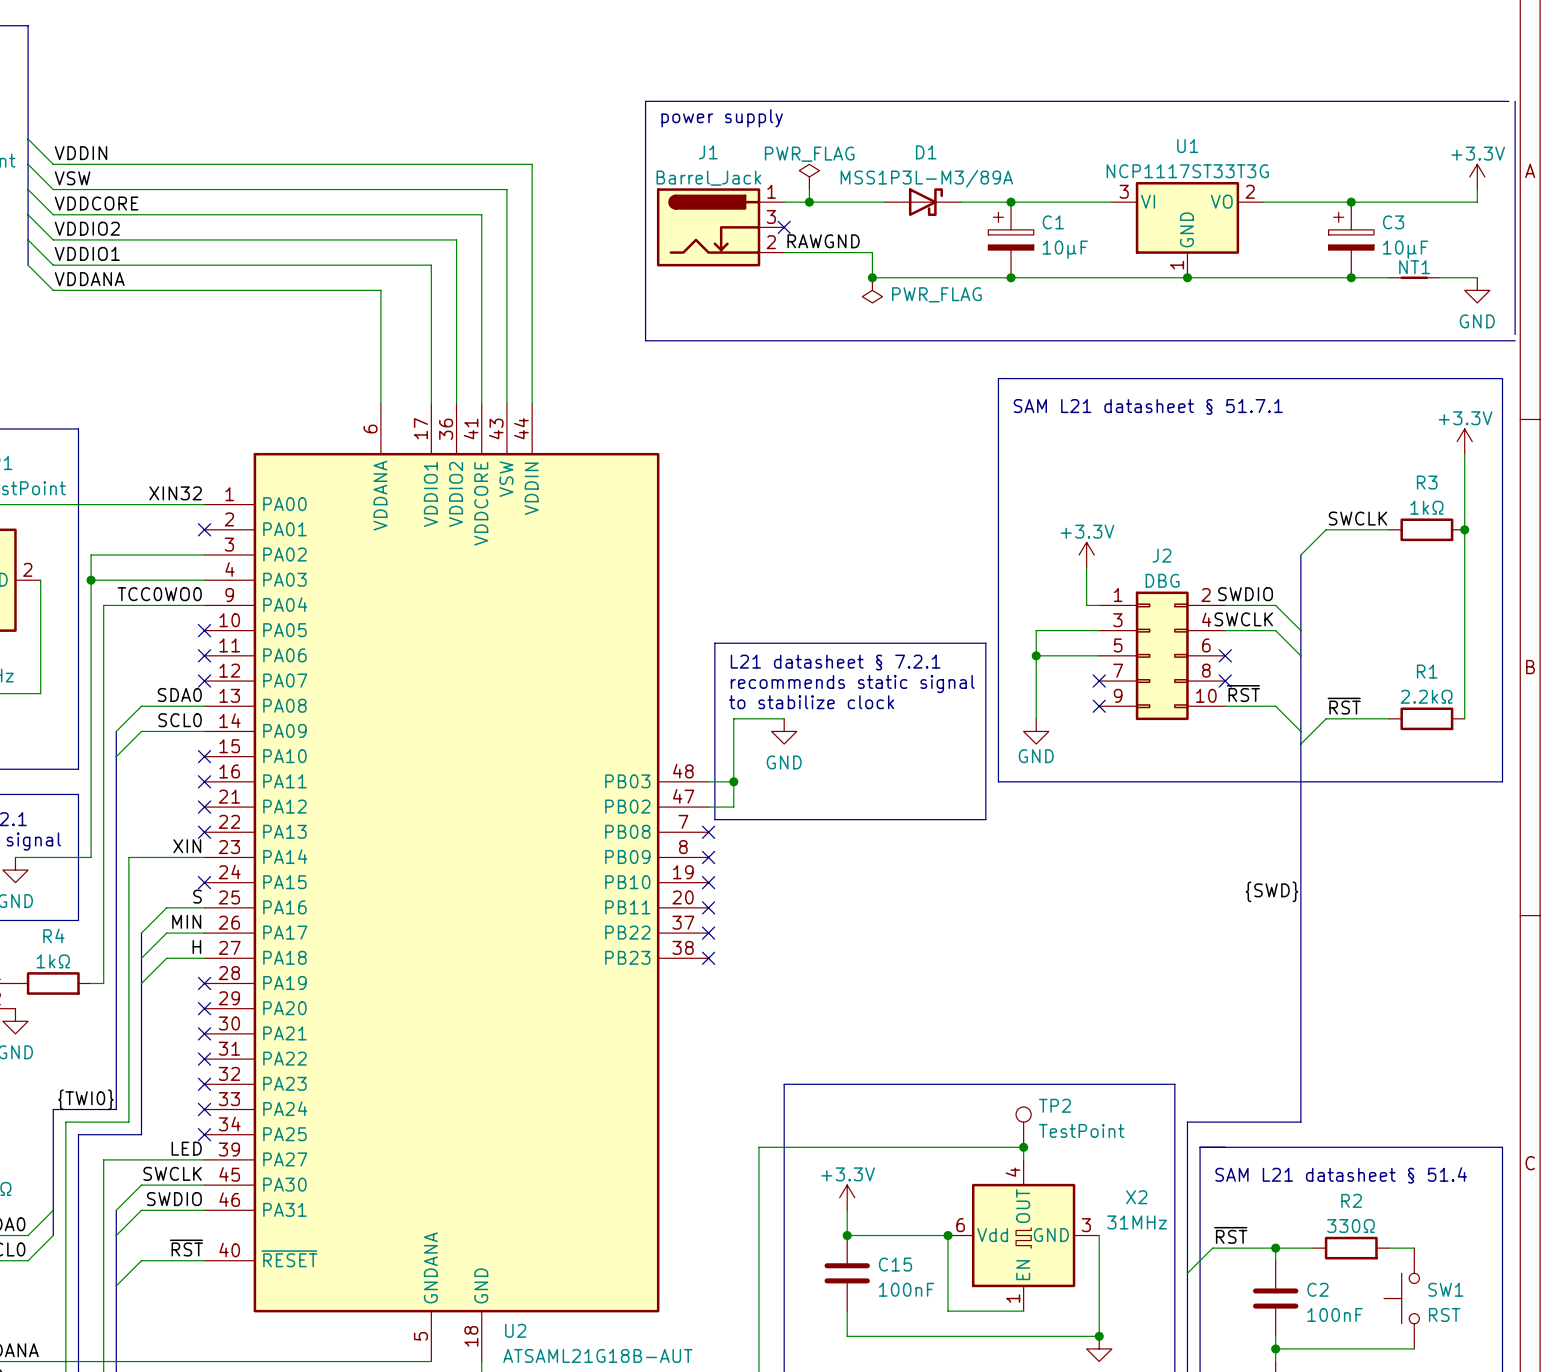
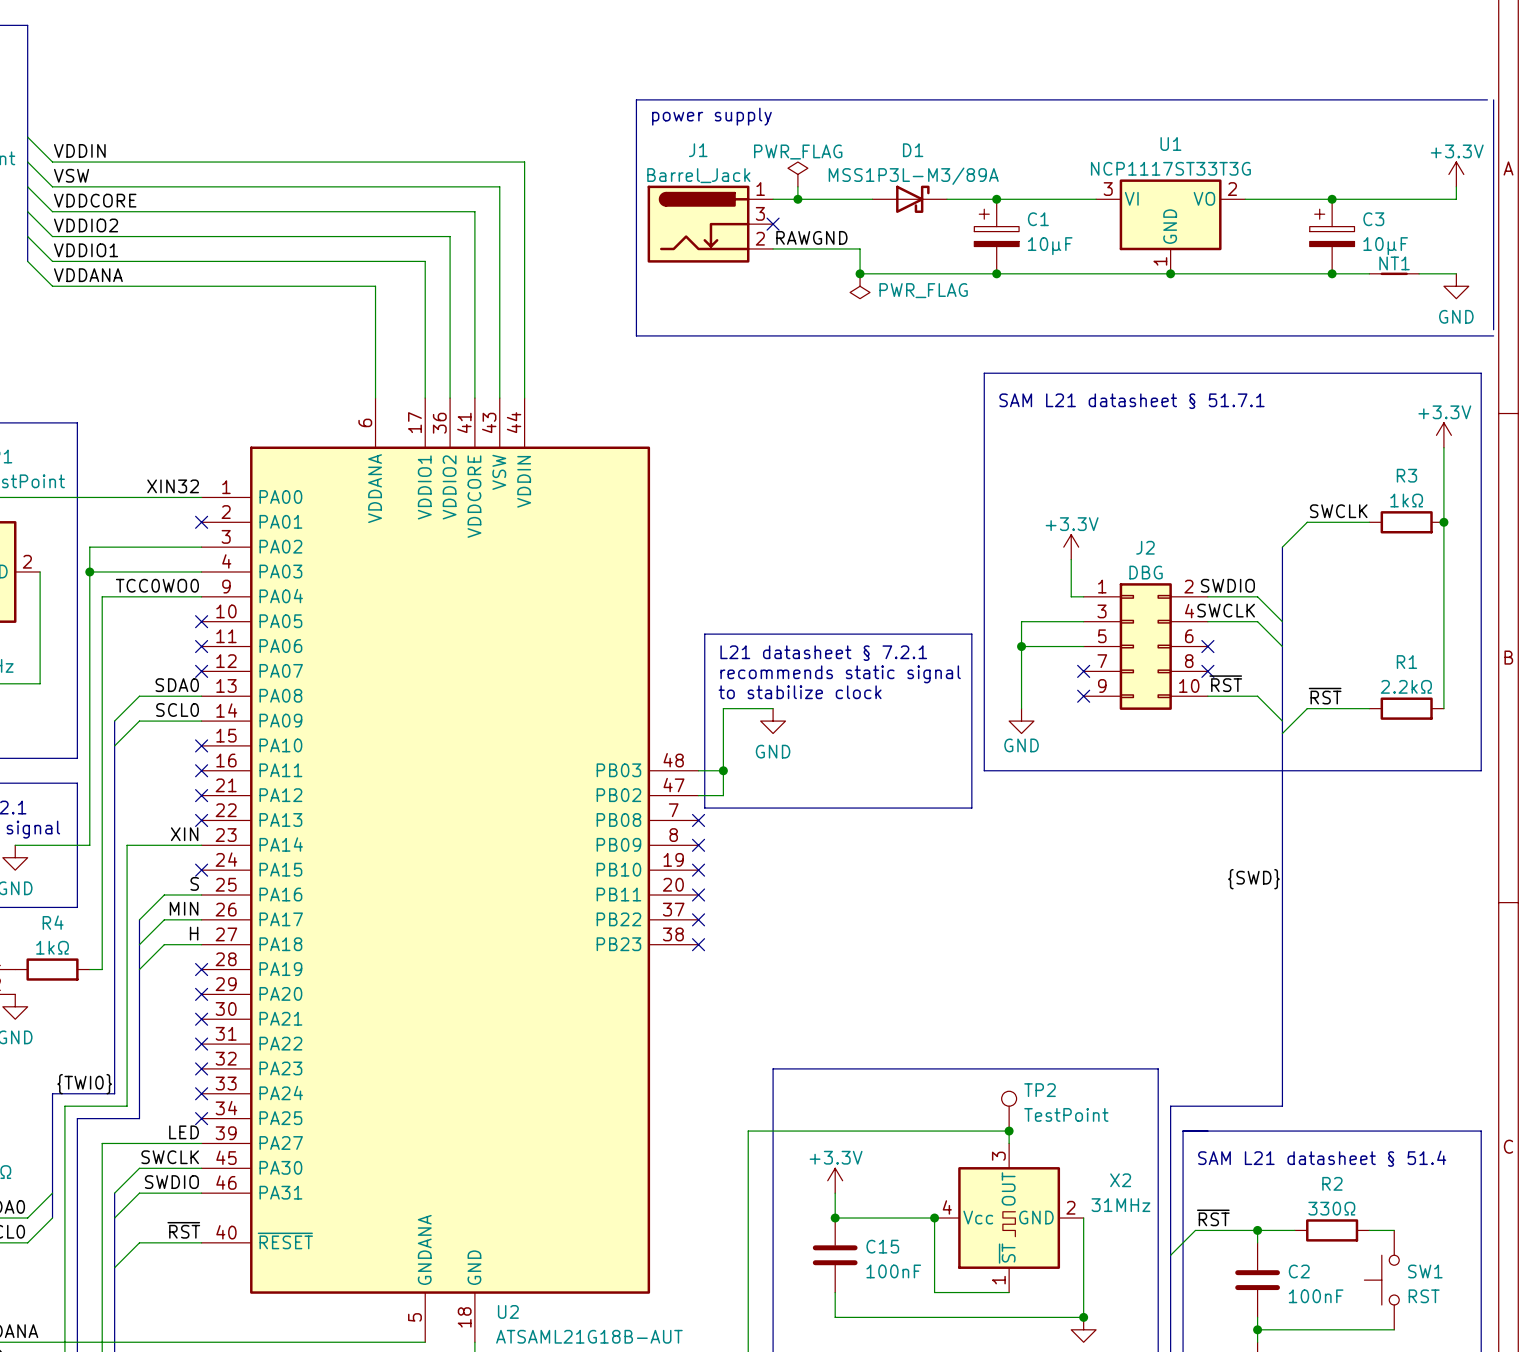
X2 symbol: [948, 1159, 1100, 1312] -> [934, 1143, 1084, 1293]

